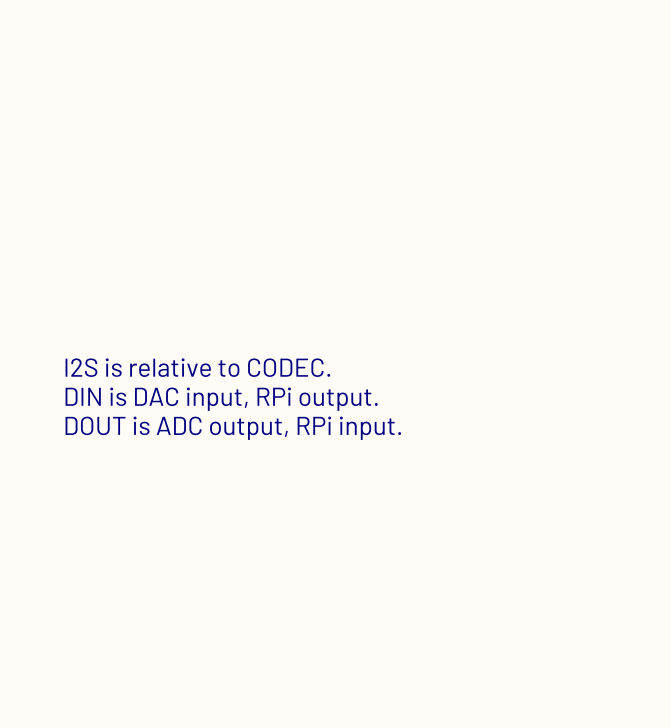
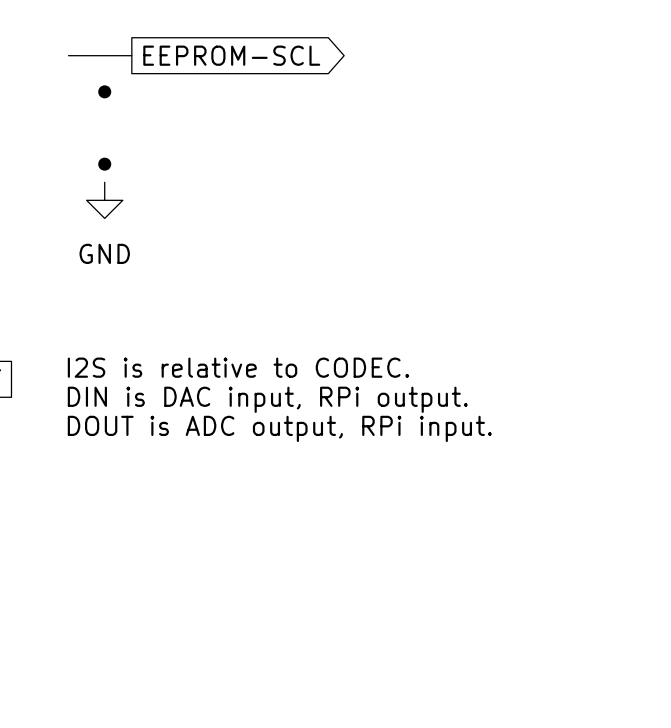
wire: none -> (68, 55) (131, 55)
global label: none -> EEPROM-SCL (231, 55)
junction: none -> (104, 91)
junction: none -> (104, 164)
power symbol: none -> GND (104, 200)

